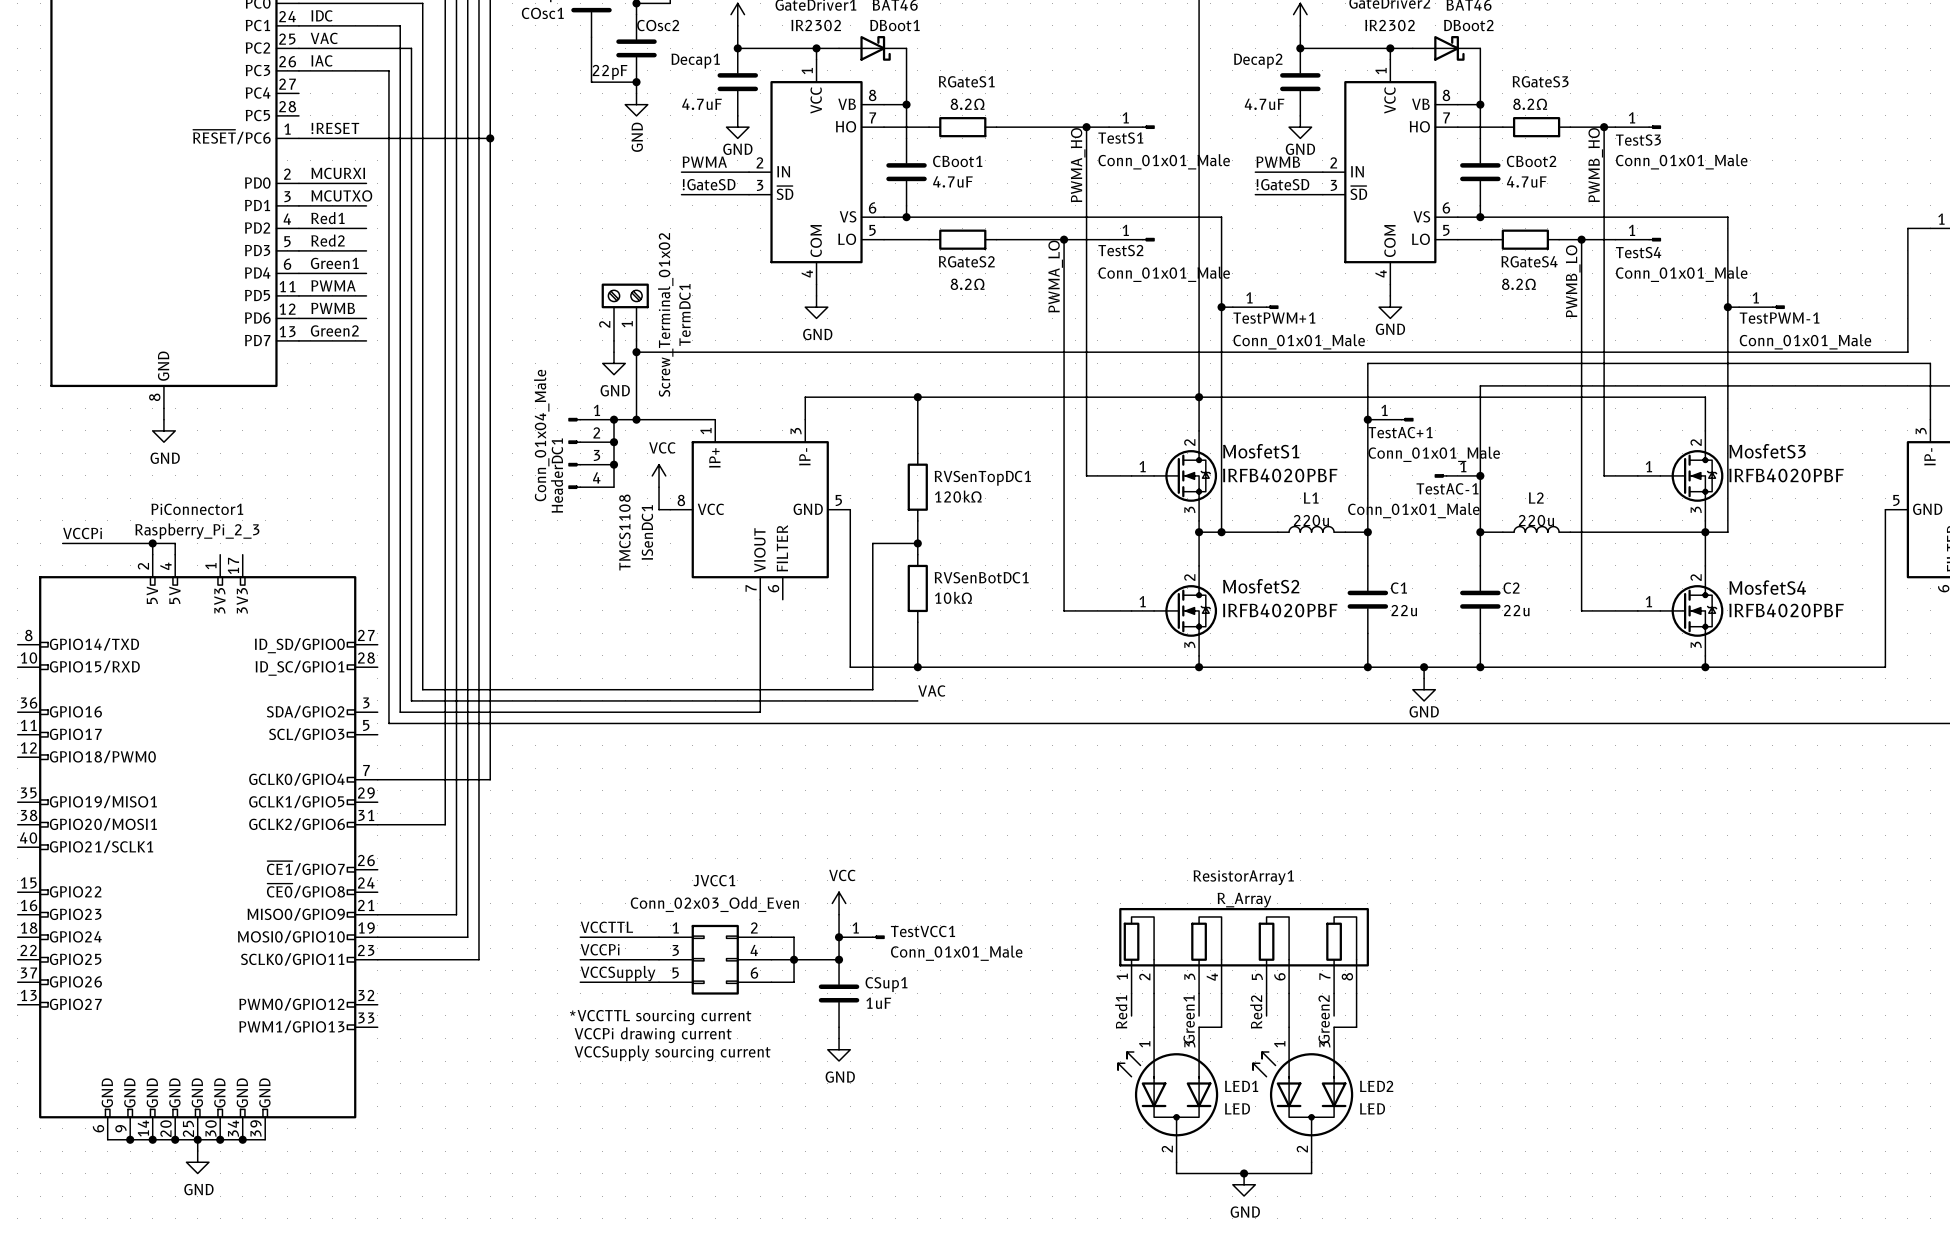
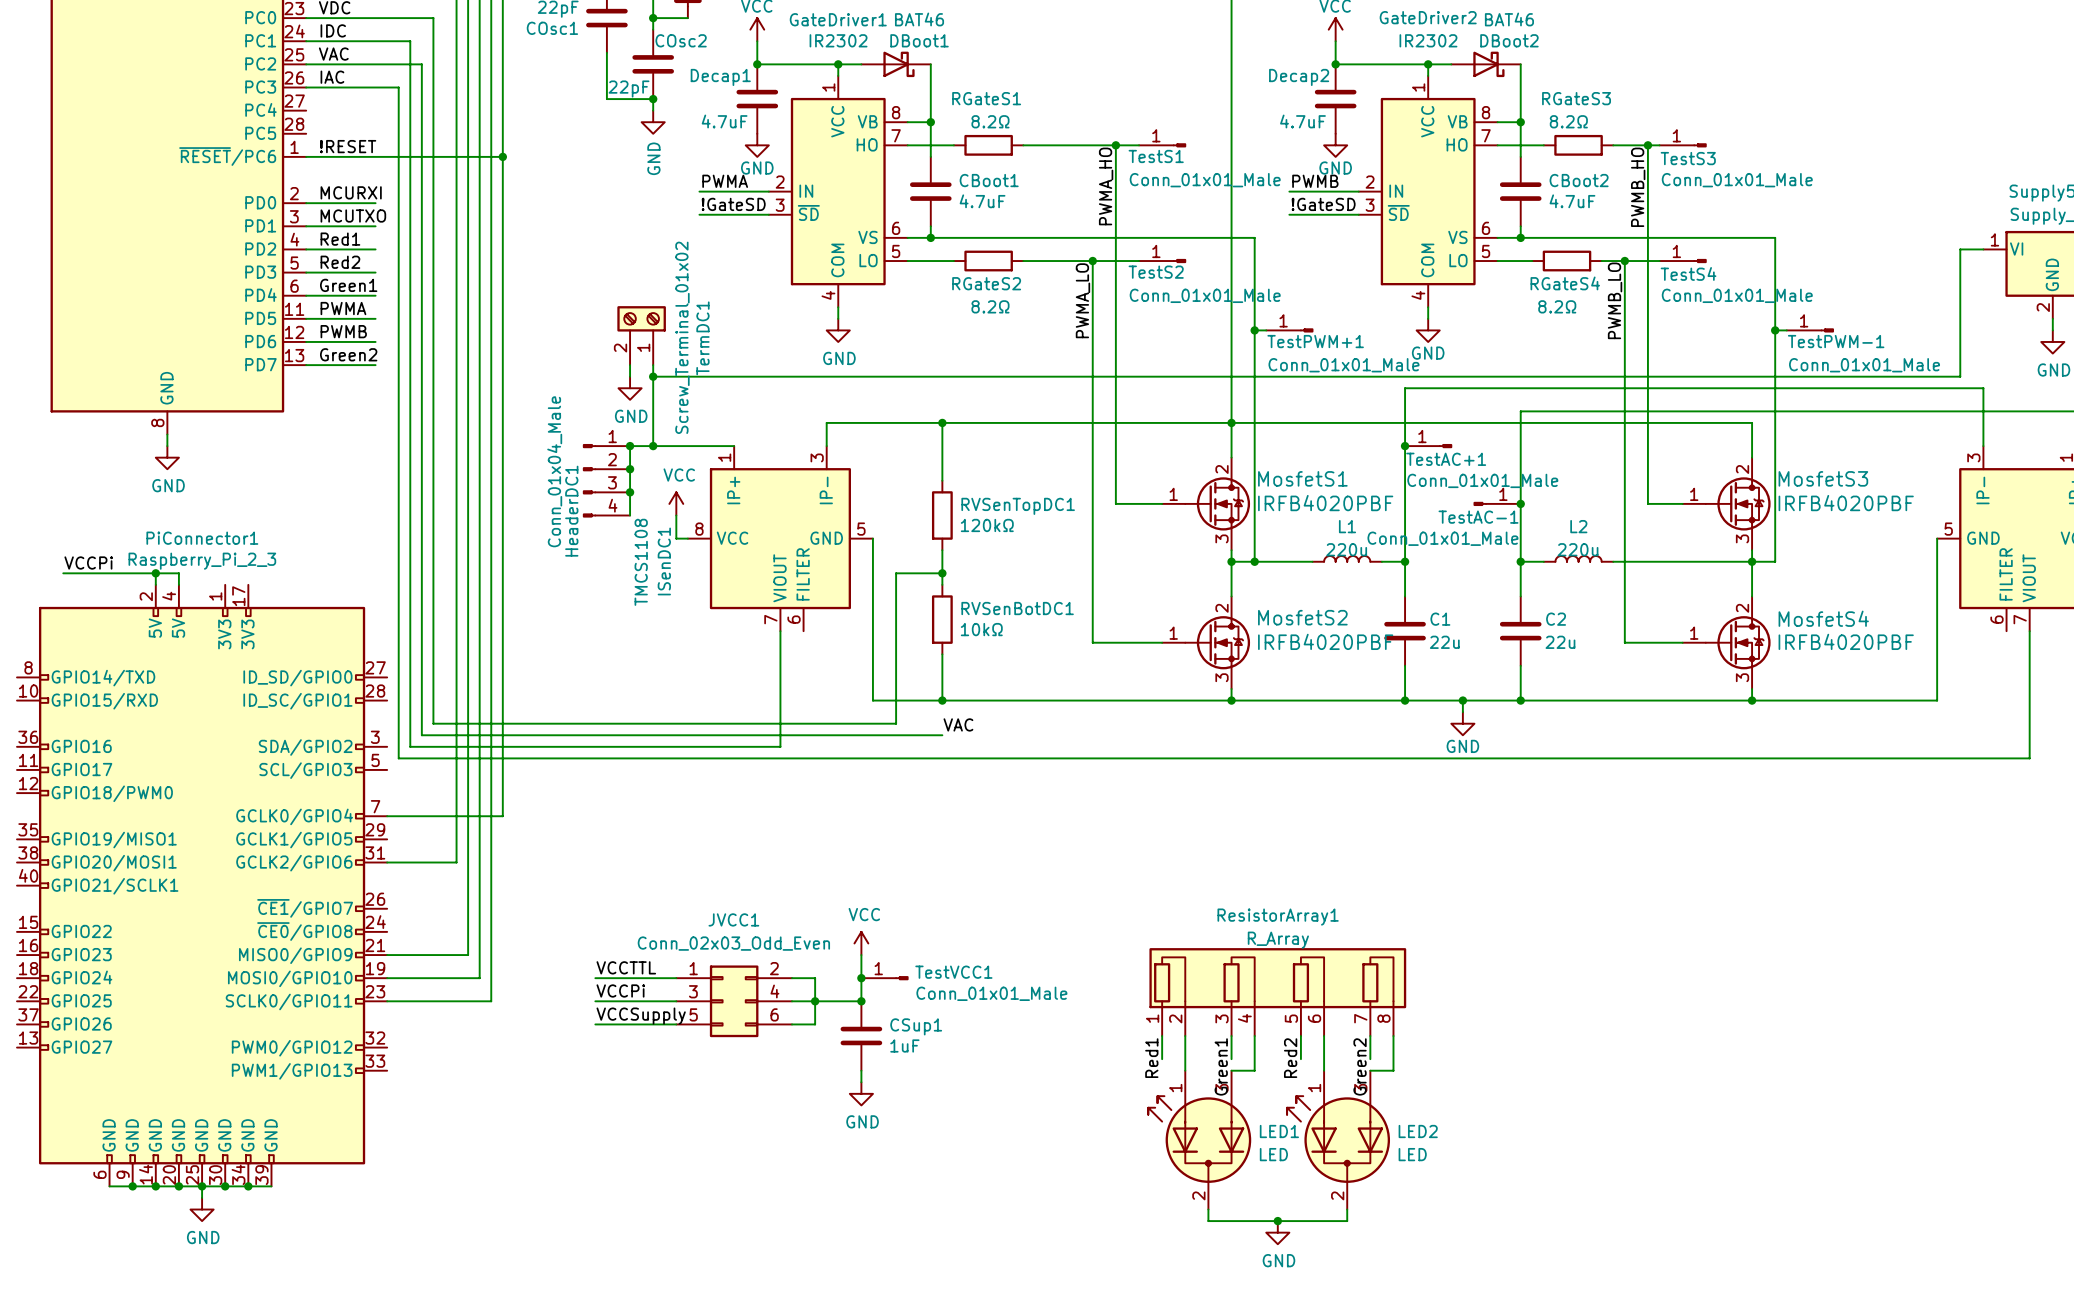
text: *VCCTTL sourcing current (660, 1017) -> none
text: VCCPi drawing current (653, 1035) -> none
text: VCCSupply sourcing current (672, 1053) -> none

